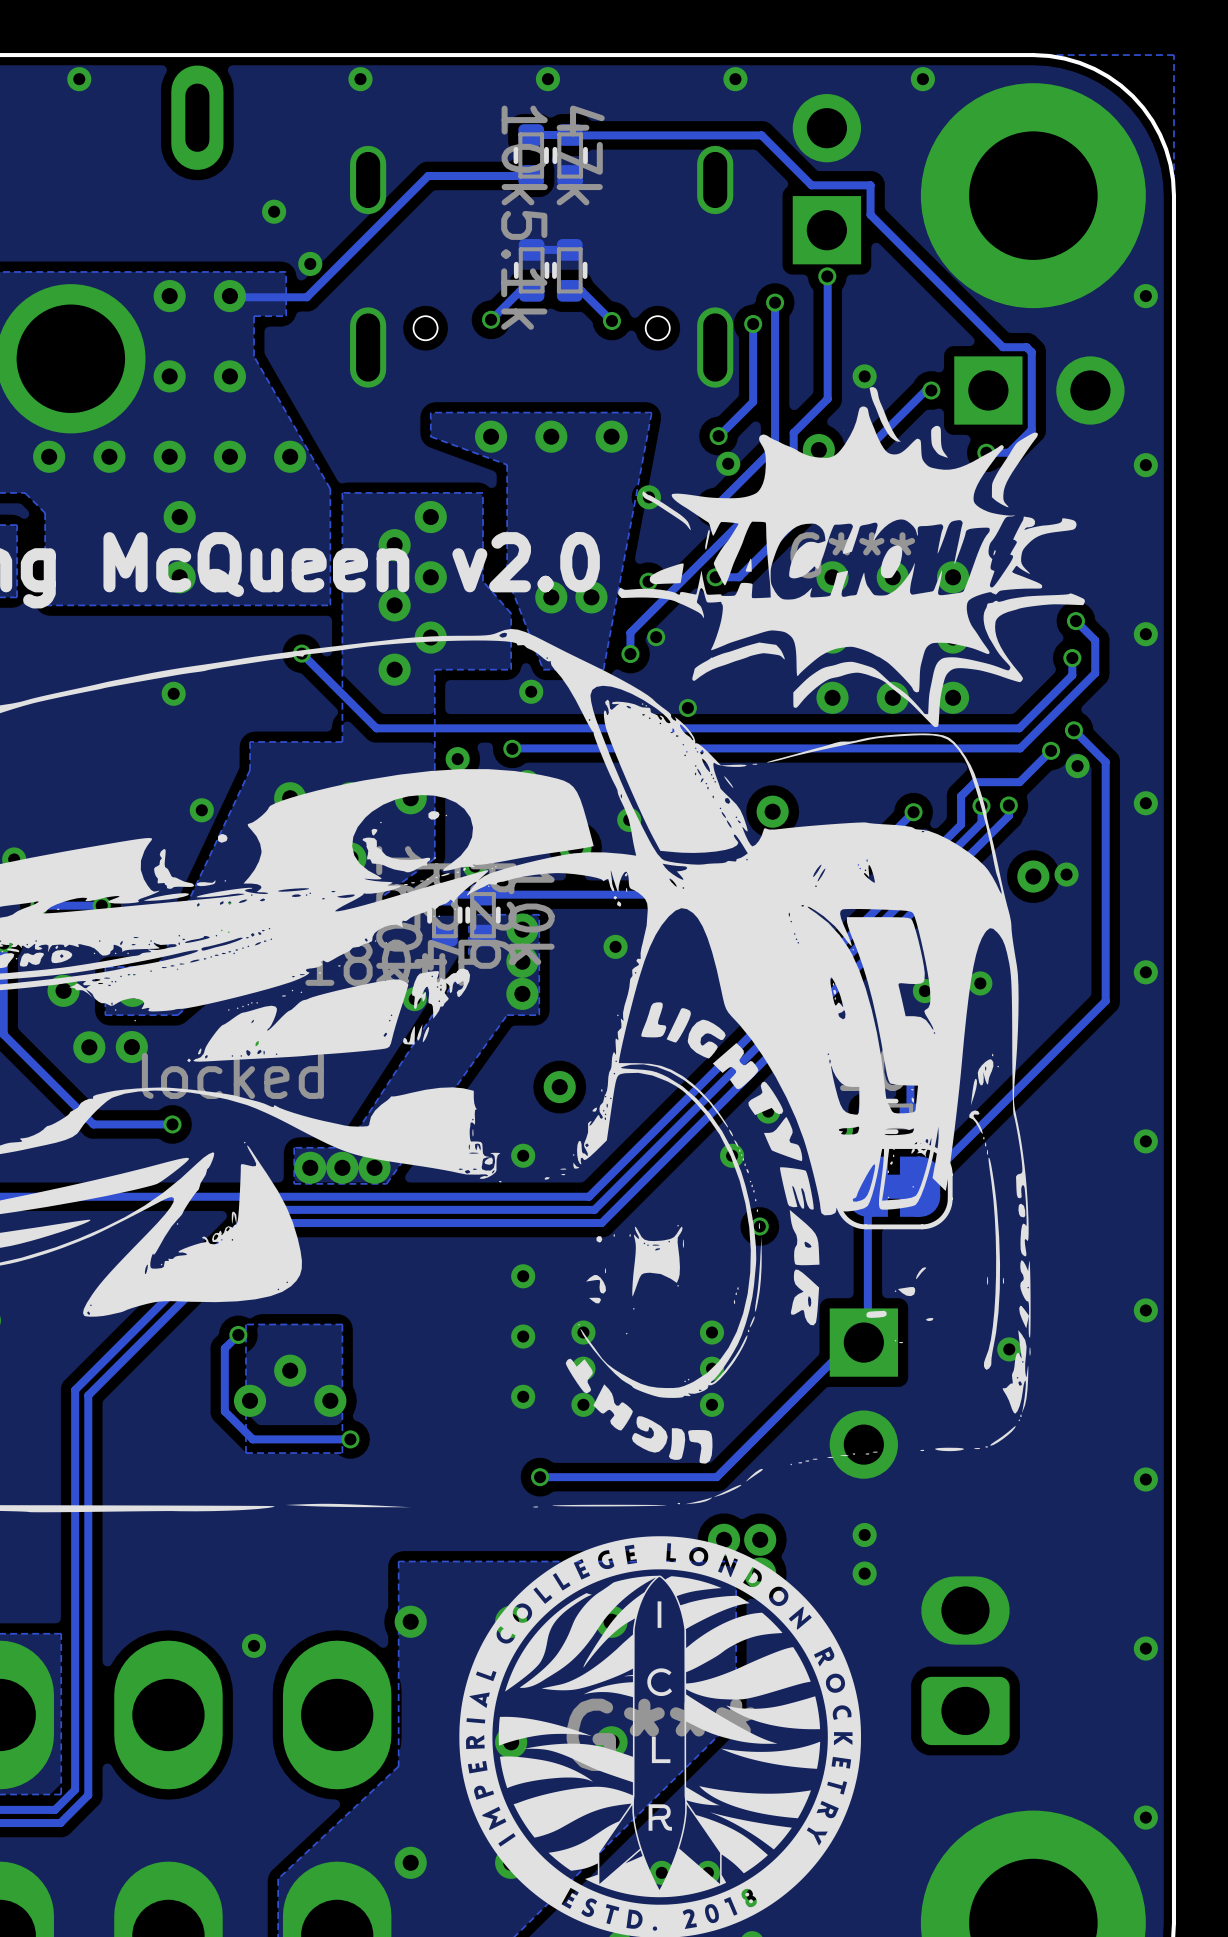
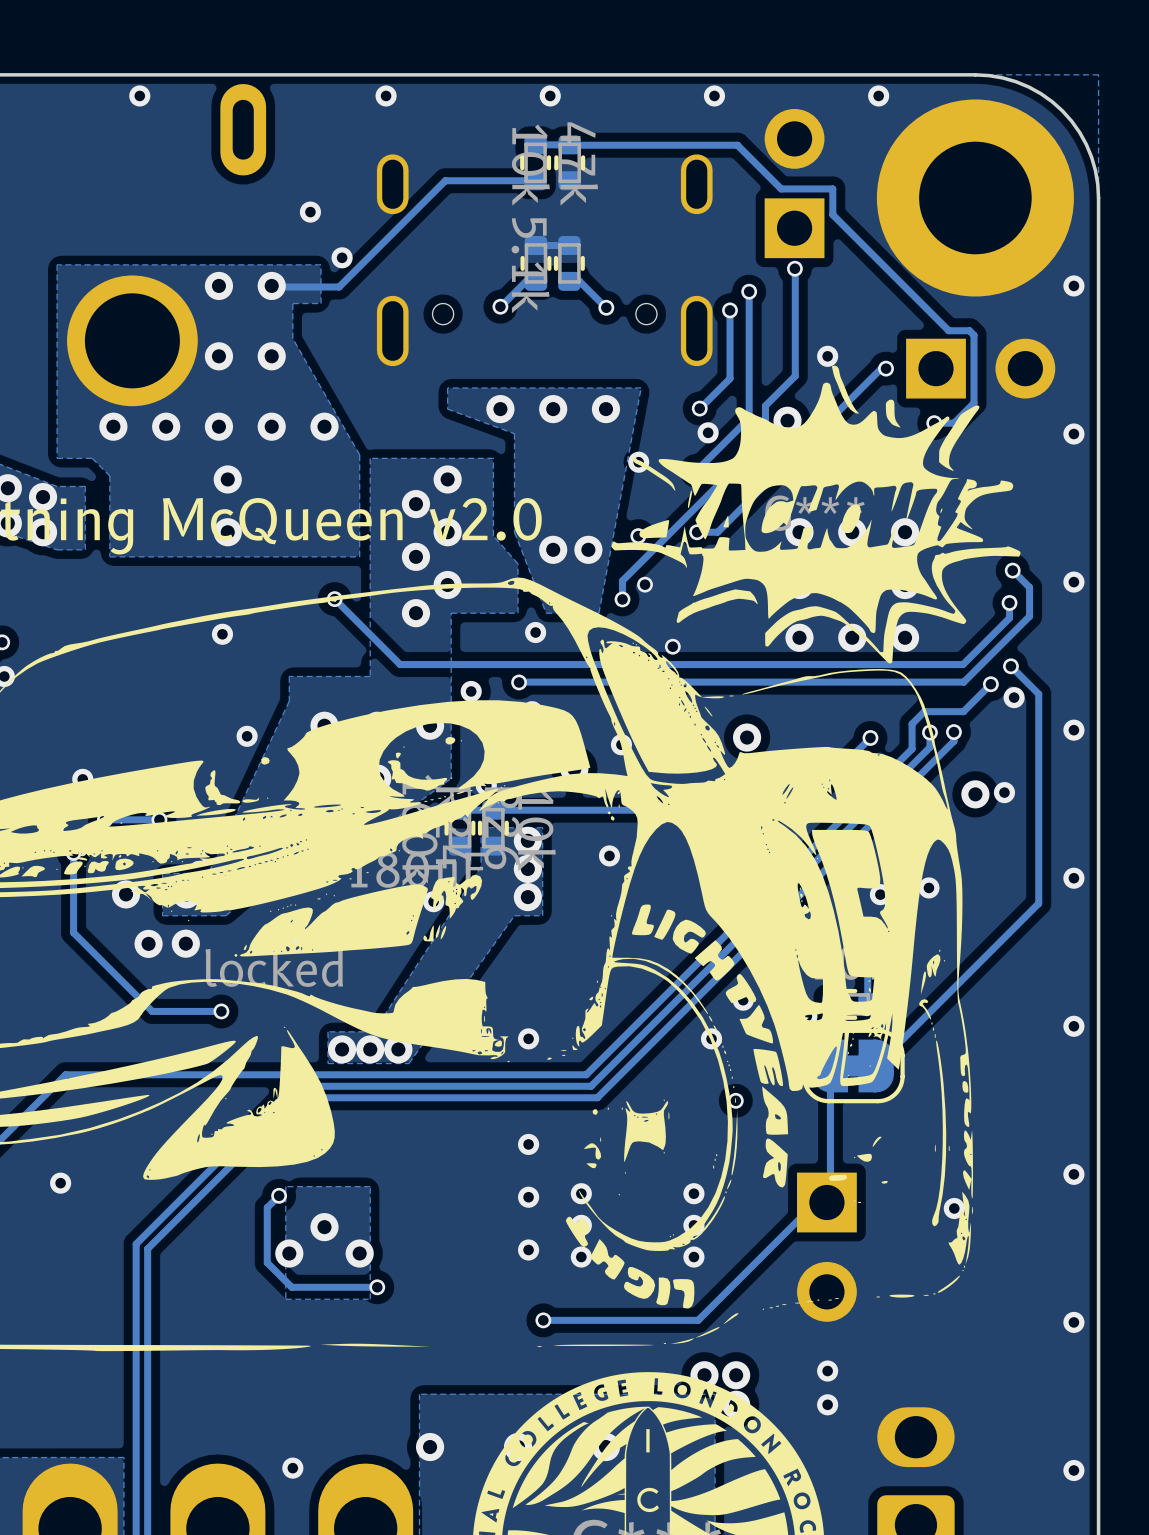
via: (559, 1087) -> none

